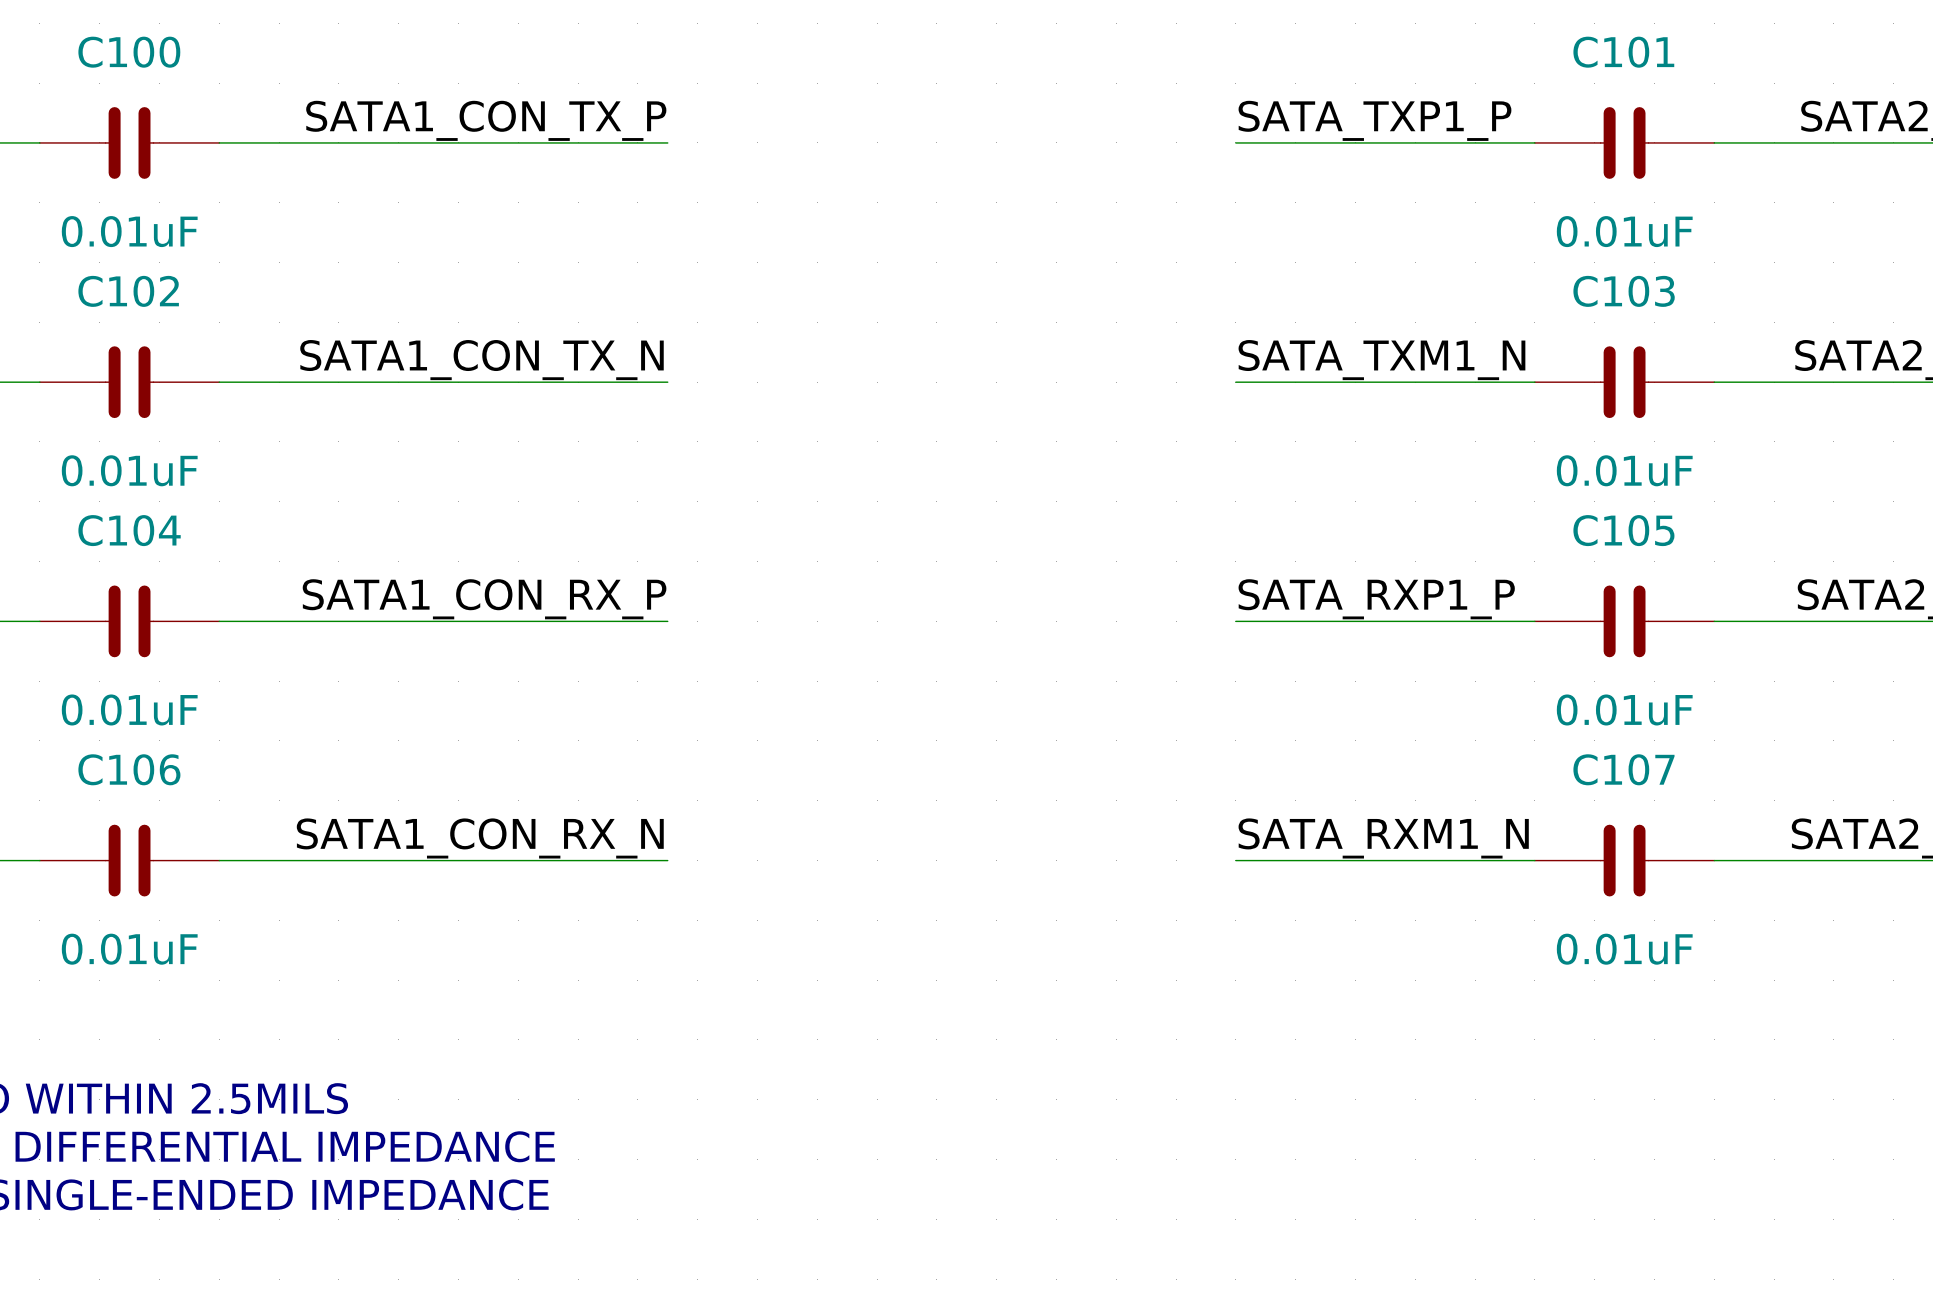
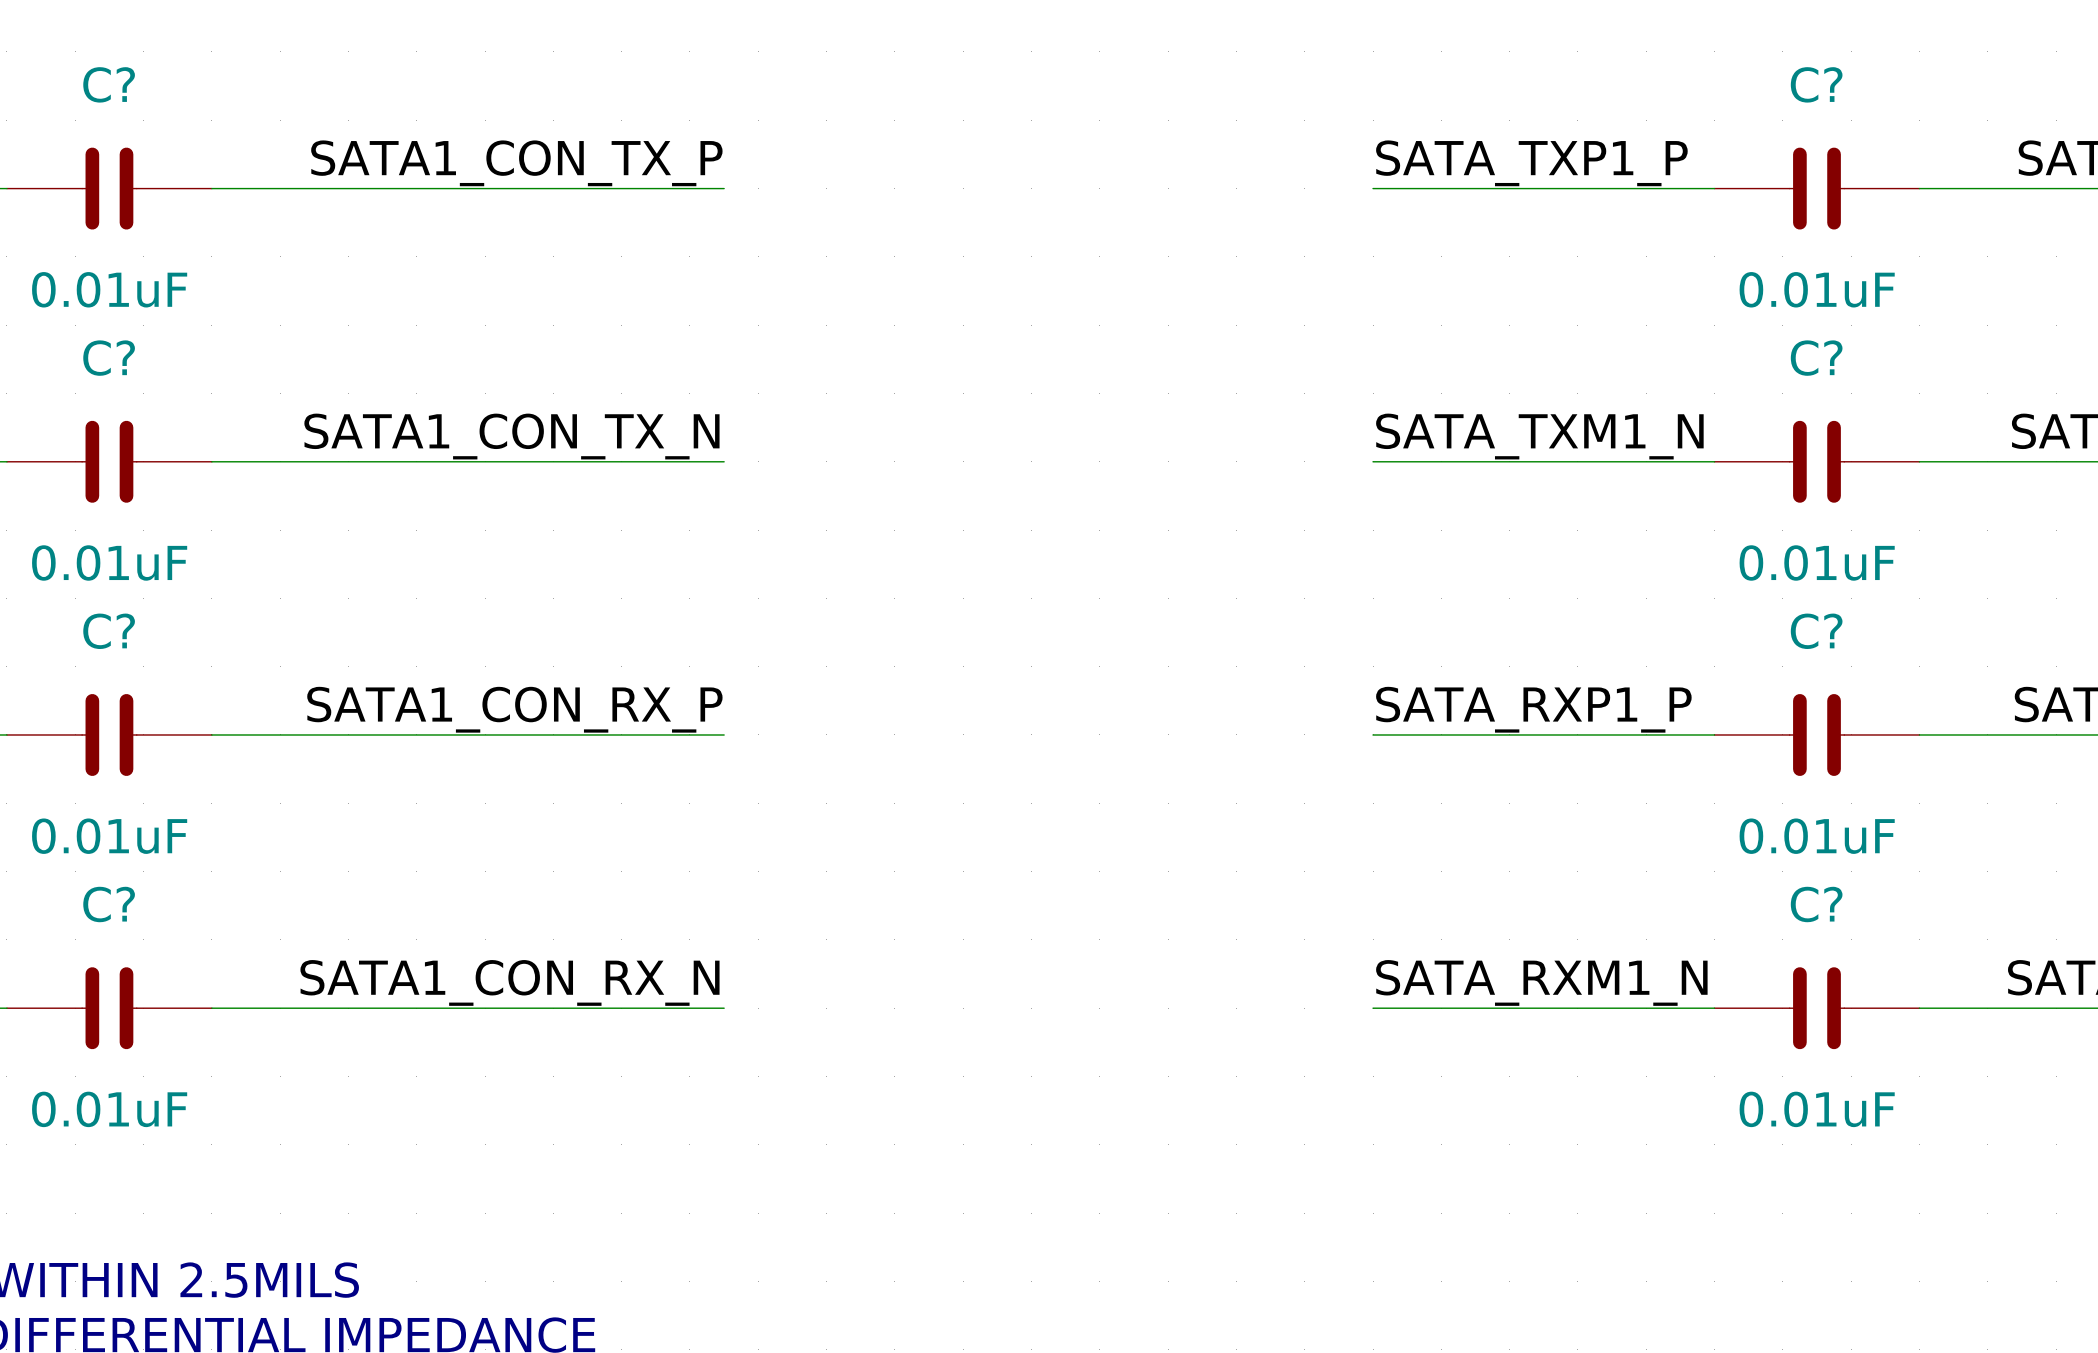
C100 name: C100 (129, 52) -> C? (109, 84)
C101 name: C101 (1623, 52) -> C? (1816, 84)
C102 name: C102 (128, 291) -> C? (109, 358)
C103 name: C103 (1624, 291) -> C? (1816, 358)
C104 name: C104 (129, 530) -> C? (109, 631)
C105 name: C105 (1623, 530) -> C? (1816, 631)
C106 name: C106 (129, 769) -> C? (109, 904)
C107 name: C107 (1623, 769) -> C? (1816, 904)

